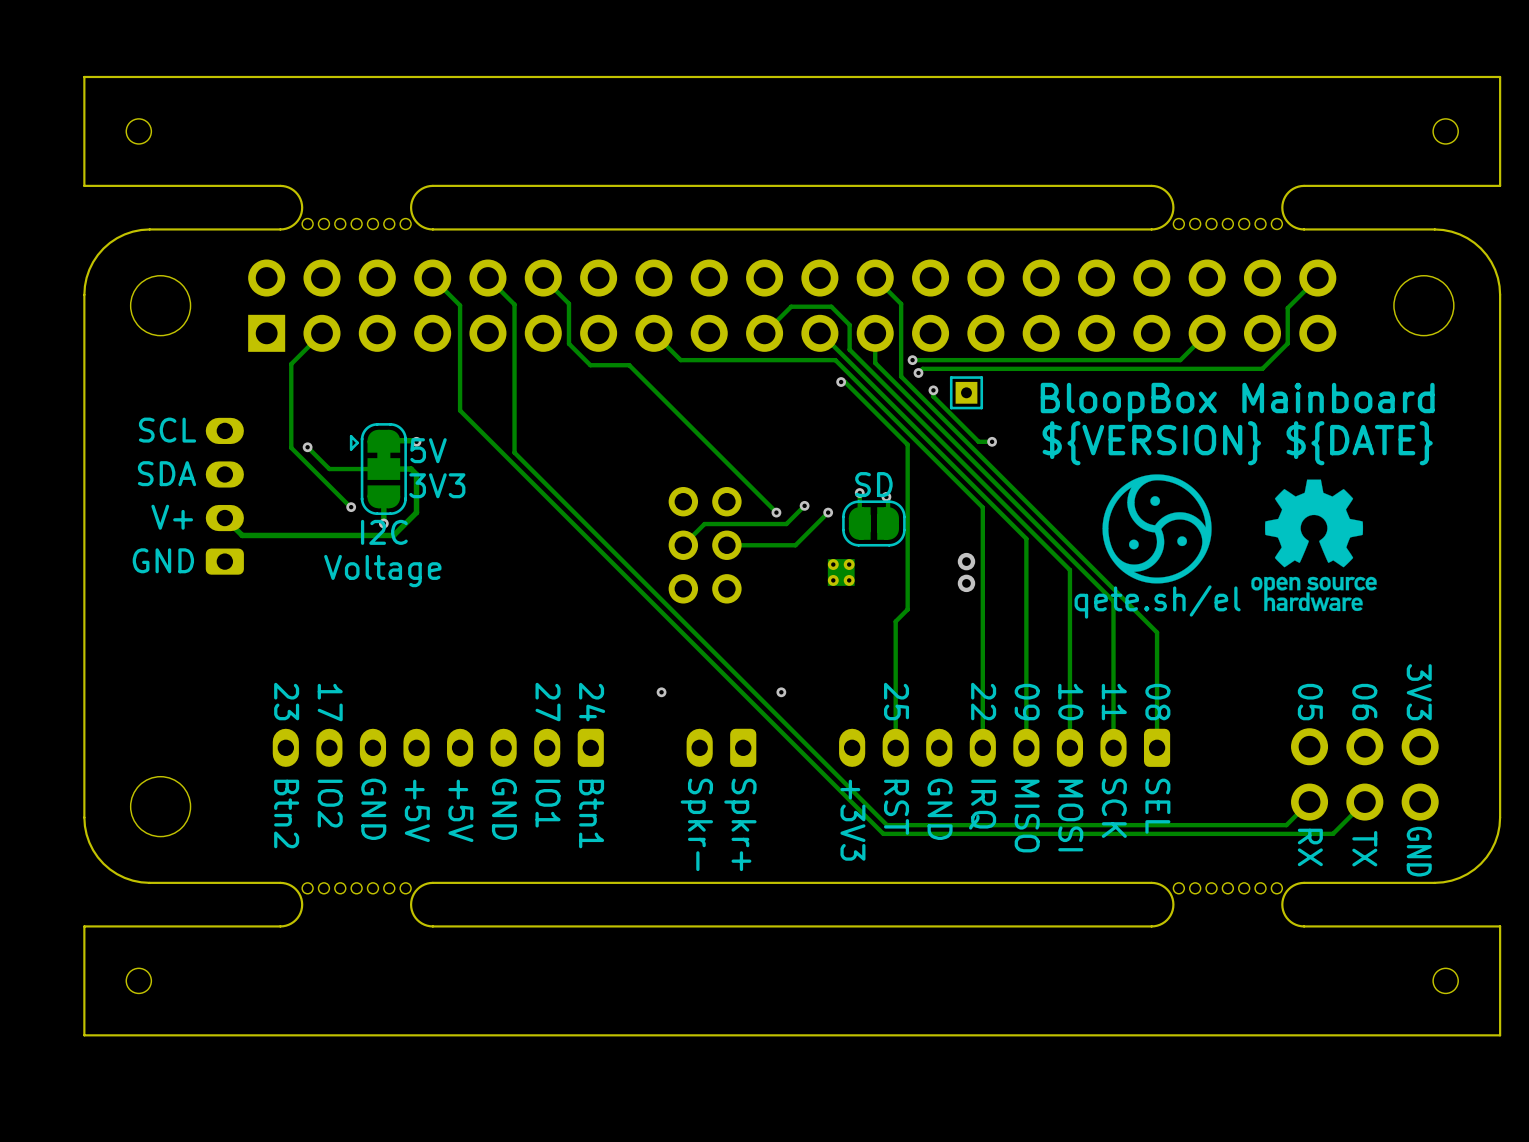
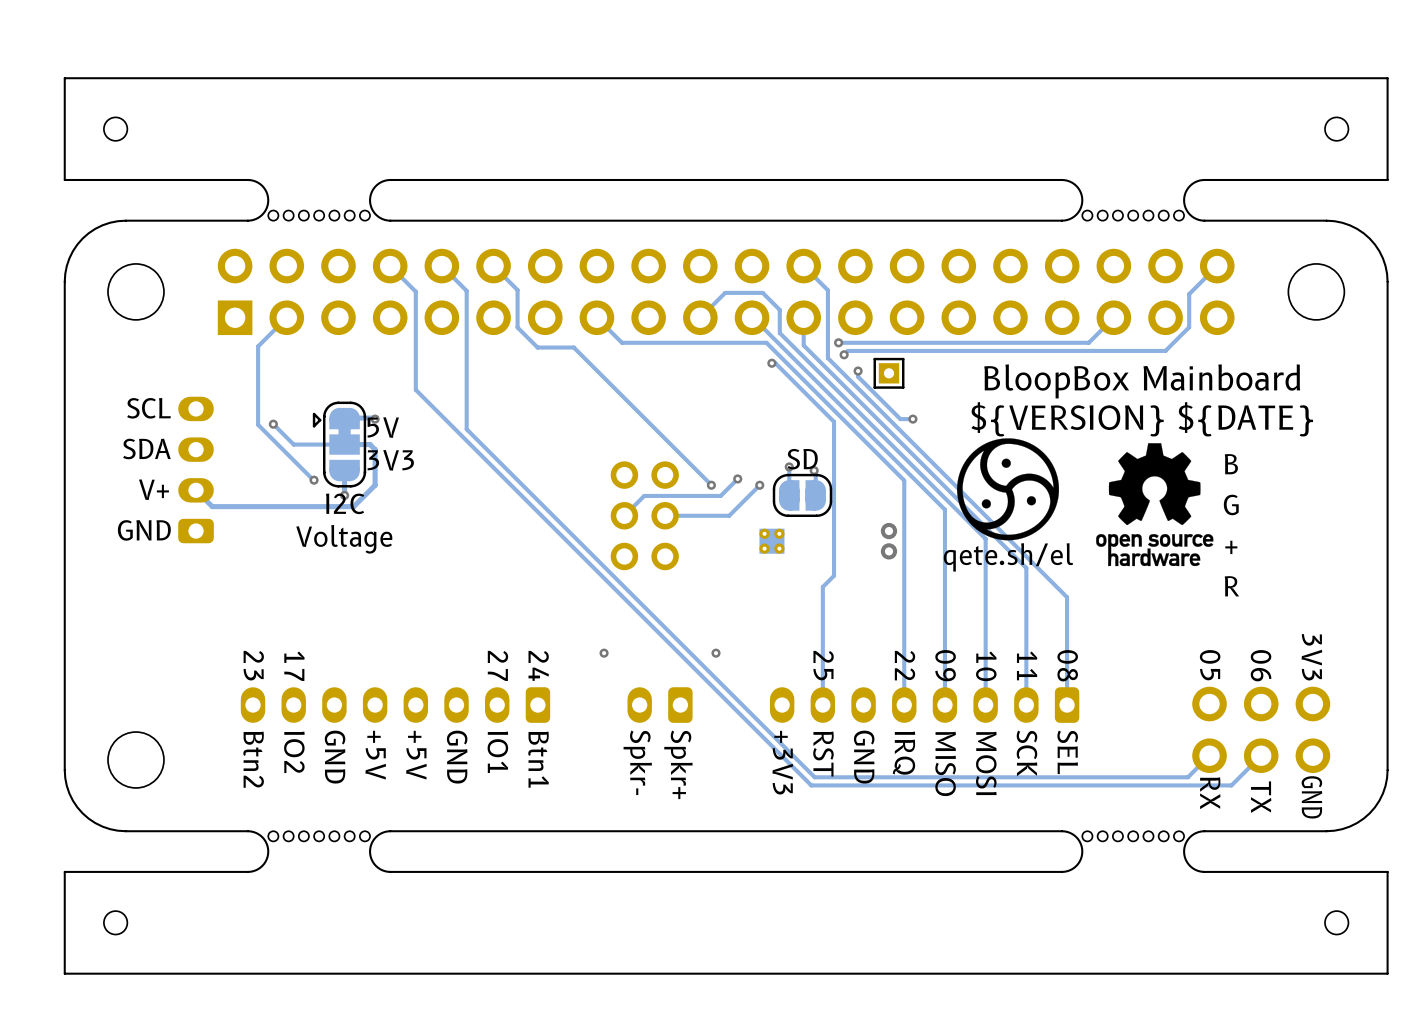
text: none -> B (1231, 464)
drawing position: (1157, 528) -> (1008, 489)
text: none -> G (1231, 504)
drawing position: (1314, 545) -> (1154, 504)
text: none -> + (1231, 547)
text position: qete.sh/el (1157, 602) -> qete.sh/el (1008, 557)
text: none -> R (1231, 586)

